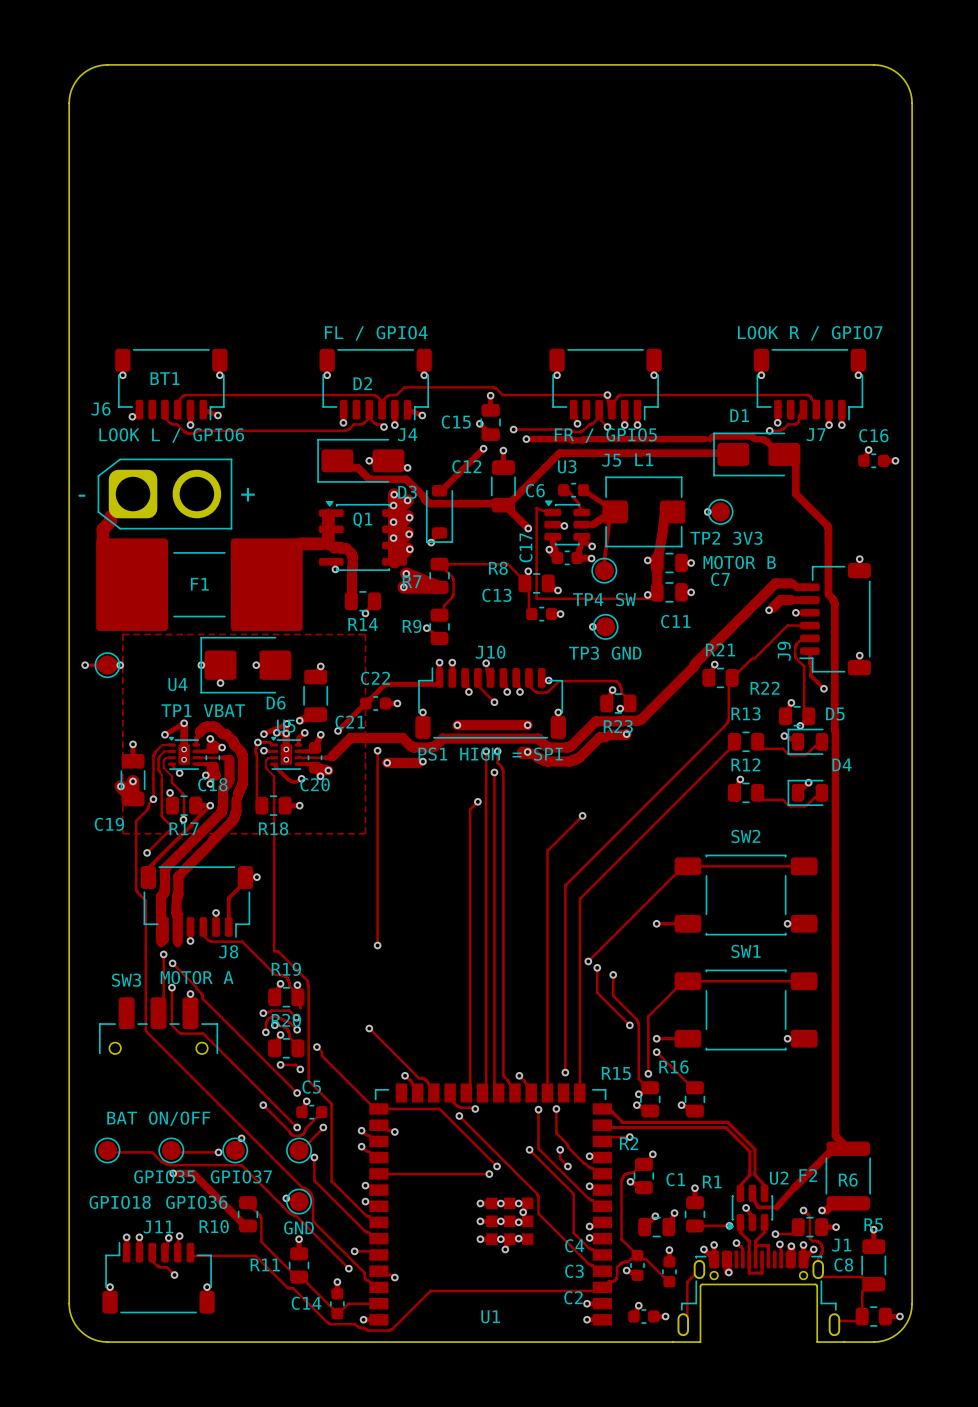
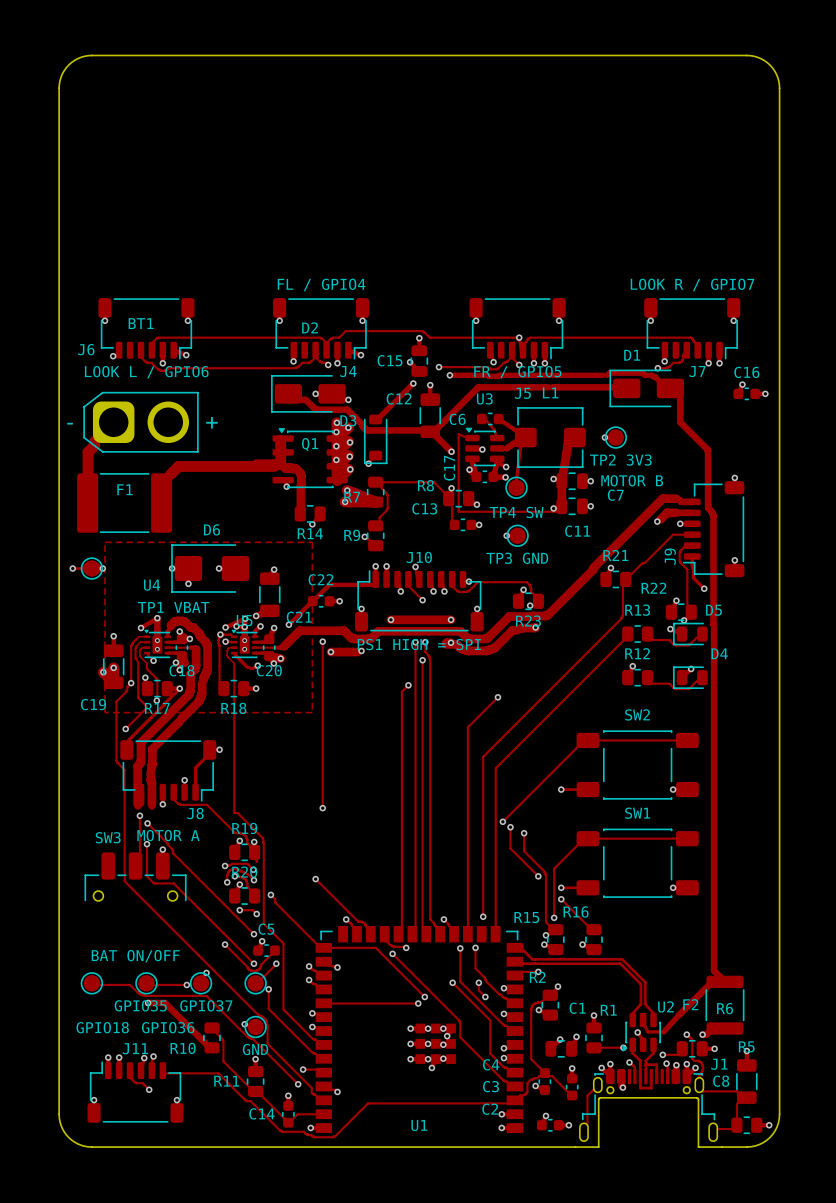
F1 footprint: [96, 538, 303, 632] -> [77, 473, 173, 533]
track: none -> (274, 466) (178, 466) (170, 474)
D6 name position: D6 (276, 703) -> D6 (211, 529)

